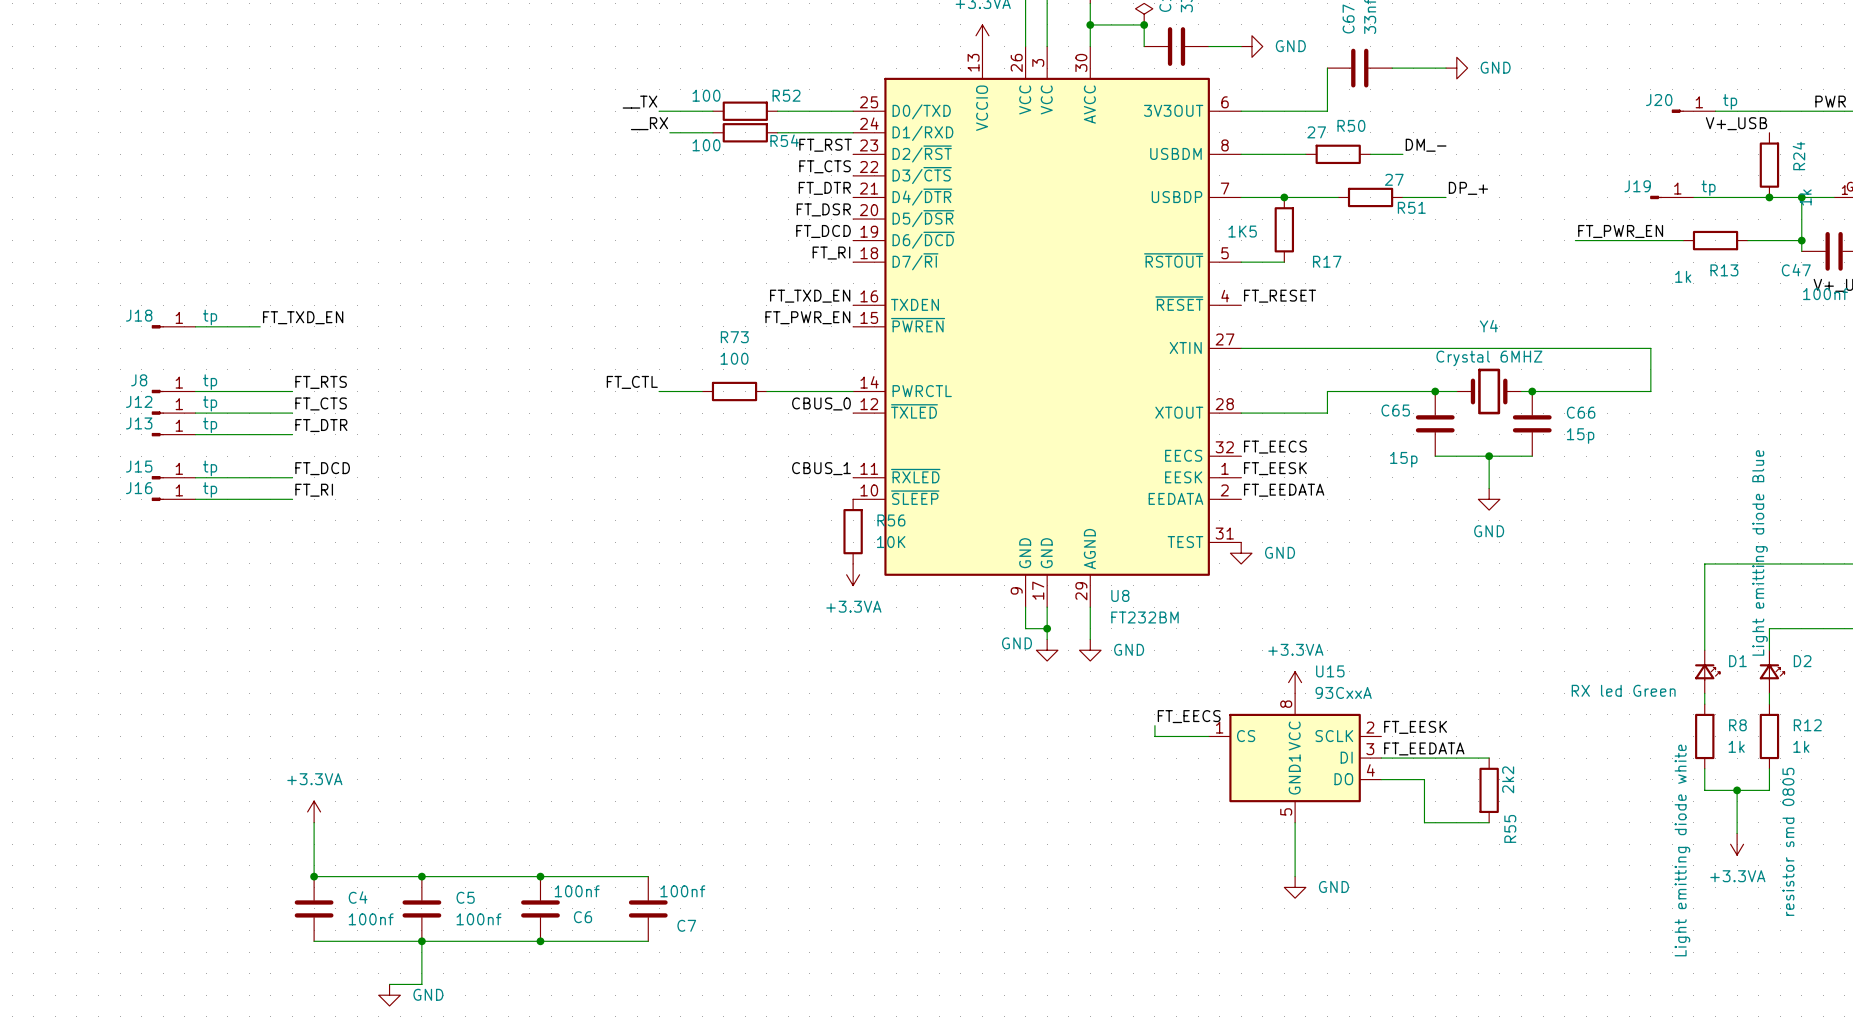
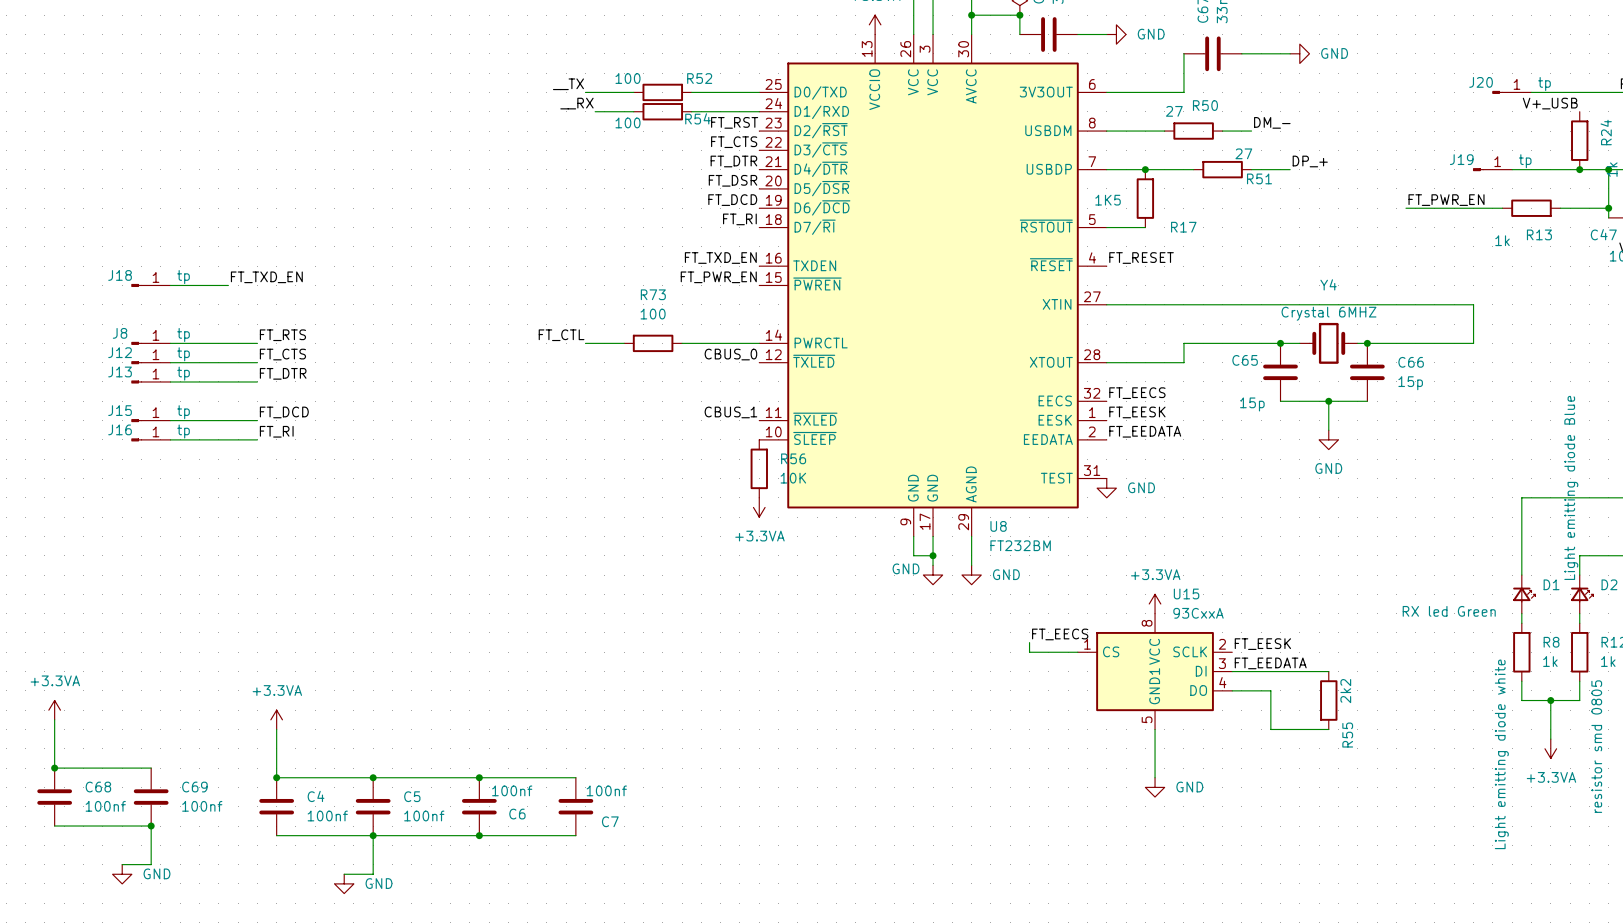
power symbol: none -> +3.3VA (54, 710)
wire: none -> (54, 719) (54, 768) (151, 768)
junction: none -> (54, 768)
C68: none -> 100nf (54, 797)
C69: none -> 100nf (151, 797)
wire: none -> (54, 826) (151, 826) (151, 864) (122, 864)
junction: none -> (151, 826)
power symbol: none -> GND (122, 874)

